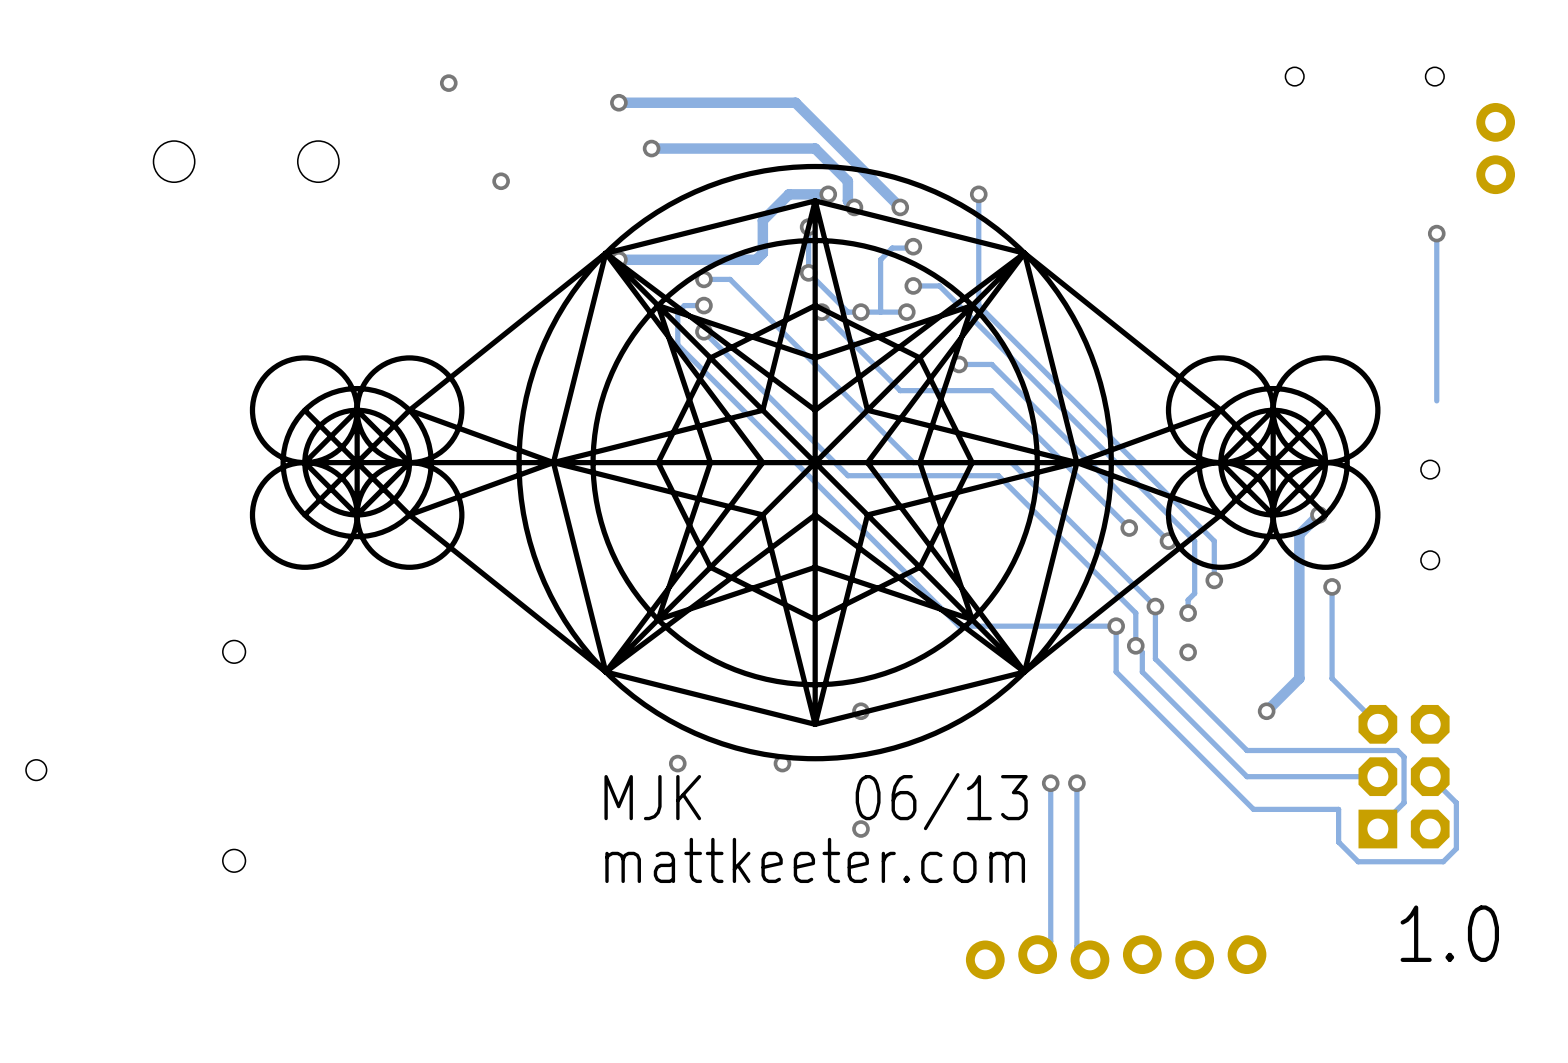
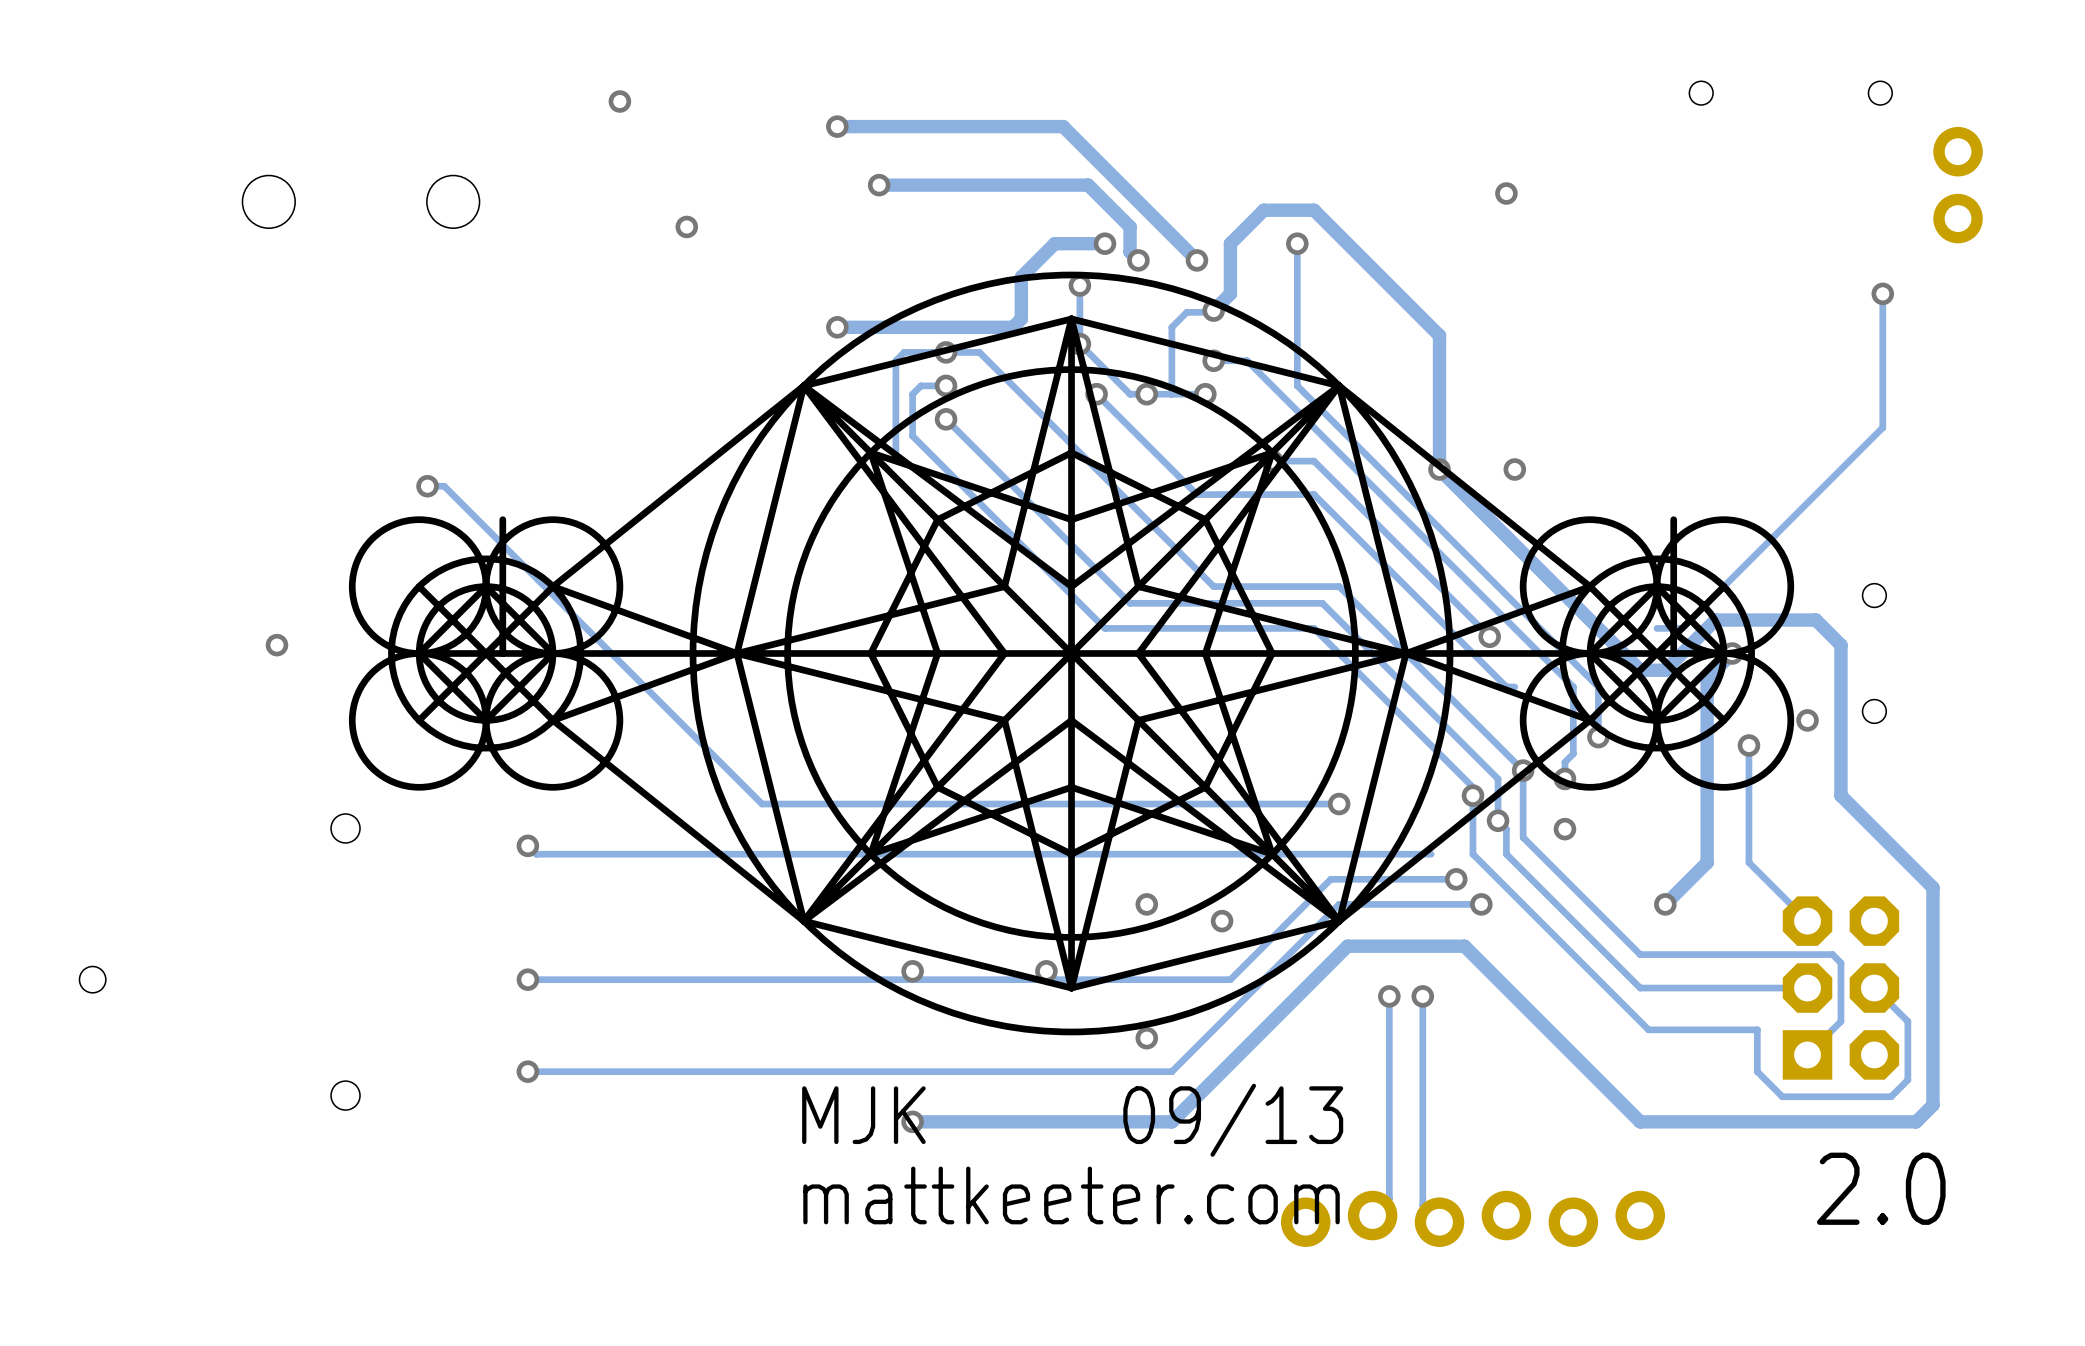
via: none -> (1506, 193)
line: (815, 200) (802, 253) -> (1339, 385) (1071, 318)
line: (815, 200) (867, 410) (1076, 462) -> (1071, 318) (1138, 586) (1406, 653)
line: (815, 200) (815, 724) -> (1071, 318) (1071, 988)
line: (815, 200) (605, 253) -> none
line: (815, 200) (1024, 253) -> none
track: none -> (1213, 310) (1230, 293) (1230, 243) (1263, 210) (1314, 210) (1439, 335) (1439, 469) (1640, 670) (1665, 670) (1715, 620) (1815, 620) (1840, 645) (1840, 795) (1932, 887) (1932, 1105) (1916, 1121) (1640, 1121) (1464, 946) (1347, 946) (1171, 1121) (912, 1121)
line: (605, 253) (592, 305) -> (1071, 318) (803, 385)
line: (605, 253) (1024, 671) -> (803, 385) (1339, 921)
line: (605, 253) (762, 462) (605, 671) -> (803, 385) (1004, 653) (803, 921)
line: (605, 253) (409, 410) -> (803, 385) (552, 586)
line: (1024, 253) (815, 410) (605, 253) -> (1339, 385) (1071, 586) (803, 385)
line: (1024, 253) (1076, 462) -> (1339, 385) (1406, 653)
line: (1024, 253) (605, 671) -> (1339, 385) (803, 921)
line: (1024, 253) (867, 462) (1024, 671) -> (1339, 385) (1138, 653) (1339, 921)
line: (1024, 253) (1220, 410) -> (1339, 385) (1590, 586)
track: none -> (946, 352) (904, 352) (895, 360) (895, 452)
line: (815, 305) (710, 357) (658, 462) (710, 567) (815, 619) (919, 567) (972, 462) (919, 357) (815, 305) -> (1071, 452) (937, 519) (870, 653) (937, 787) (1071, 854) (1205, 787) (1272, 653) (1205, 519) (1071, 452)
line: (972, 305) (919, 462) (972, 619) (815, 567) (658, 619) (710, 462) (658, 305) (815, 357) (972, 305) -> (1272, 452) (1205, 653) (1272, 854) (1071, 787) (870, 854) (937, 653) (870, 452) (1071, 519) (1272, 452)
track: (1436, 338) (1436, 400) -> (1882, 427) (1682, 628) (1656, 628)
drawing: [249, 355, 465, 570] -> none
drawing: [1165, 355, 1381, 570] -> none
via: none -> (1439, 469)
via: none -> (1514, 469)
track: none -> (427, 486) (444, 486) (762, 804) (1339, 804)
via: none -> (427, 486)
drawing: none -> [348, 516, 624, 791]
drawing: none -> [1519, 516, 1795, 791]
line: (304, 410) (409, 514) -> (419, 586) (552, 720)
line: (409, 410) (553, 462) -> (552, 586) (736, 653)
line: (409, 410) (304, 514) -> (552, 586) (419, 720)
line: (762, 410) (553, 462) -> (1021, 519) (1004, 586) (736, 653)
line: (1220, 410) (1325, 514) -> (1590, 586) (1723, 720)
line: (1220, 410) (1076, 462) -> none
line: (1325, 410) (1220, 514) -> (1723, 586) (1590, 720)
line: (304, 462) (357, 514) (409, 462) (357, 410) (304, 462) -> (419, 653) (486, 720) (552, 653) (486, 586) (419, 653)
drawing position: (357, 462) -> (486, 653)
line: (553, 462) (409, 514) -> (753, 586) (736, 653)
line: (553, 462) (762, 514) (815, 724) -> (736, 653) (1004, 720) (1071, 988)
line: (553, 462) (605, 671) -> (736, 653) (803, 921)
drawing position: (815, 462) -> (1071, 653)
drawing position: (815, 462) -> (1071, 653)
line: (1076, 462) (867, 514) (854, 567) -> (1406, 653) (1138, 720)
line: (1076, 462) (1063, 514) -> (1590, 586) (1406, 653)
line: (1076, 462) (1220, 514) -> (1406, 653) (1590, 720)
drawing position: (1273, 462) -> (1656, 653)
line: (1325, 462) (1273, 410) (1220, 462) (1273, 514) (1325, 462) -> (1723, 653) (1656, 586) (1590, 653) (1656, 720) (1723, 653)
line: (1325, 462) (304, 462) -> (1723, 653) (419, 653)
track: (828, 495) (959, 626) (1116, 626) -> (1104, 628) (1314, 628) (1472, 787) (1472, 795)
track: (1129, 501) (1168, 541) -> none
via: none -> (276, 645)
line: (409, 514) (605, 671) -> (552, 720) (803, 921)
line: none -> (736, 653) (552, 720)
line: (1220, 514) (1024, 671) -> (1590, 720) (1339, 921)
track: none -> (1489, 670) (1506, 686) (1514, 686)
via position: (1129, 528) -> (1489, 636)
via: (1168, 541) -> none
via: none -> (1807, 720)
via: none -> (1339, 804)
track: none -> (527, 845) (536, 854) (1431, 854)
via: none -> (527, 845)
line: (605, 671) (815, 724) -> (1071, 988) (1088, 921)
line: (1024, 671) (815, 724) -> (1355, 854) (1339, 921)
line: (1024, 671) (815, 514) (605, 671) -> (1339, 921) (1071, 720) (803, 921)
track: none -> (1456, 879) (1330, 879) (1230, 979) (527, 979)
via: none -> (1456, 879)
track: none -> (1481, 904) (1339, 904) (1171, 1071) (527, 1071)
via: none -> (1481, 904)
line: none -> (803, 921) (1071, 988)
via: none -> (1222, 921)
line: none -> (1339, 921) (1071, 988)
via: none -> (527, 979)
text: MJK 06/13 (816, 801) -> MJK 09/13 (1072, 1120)
via position: (860, 829) -> (1146, 1038)
via: none -> (527, 1071)
text position: mattkeeter.com (815, 860) -> mattkeeter.com (1071, 1195)
via: none -> (912, 1121)
text: 1.0 (1449, 933) -> 2.0 (1881, 1188)

